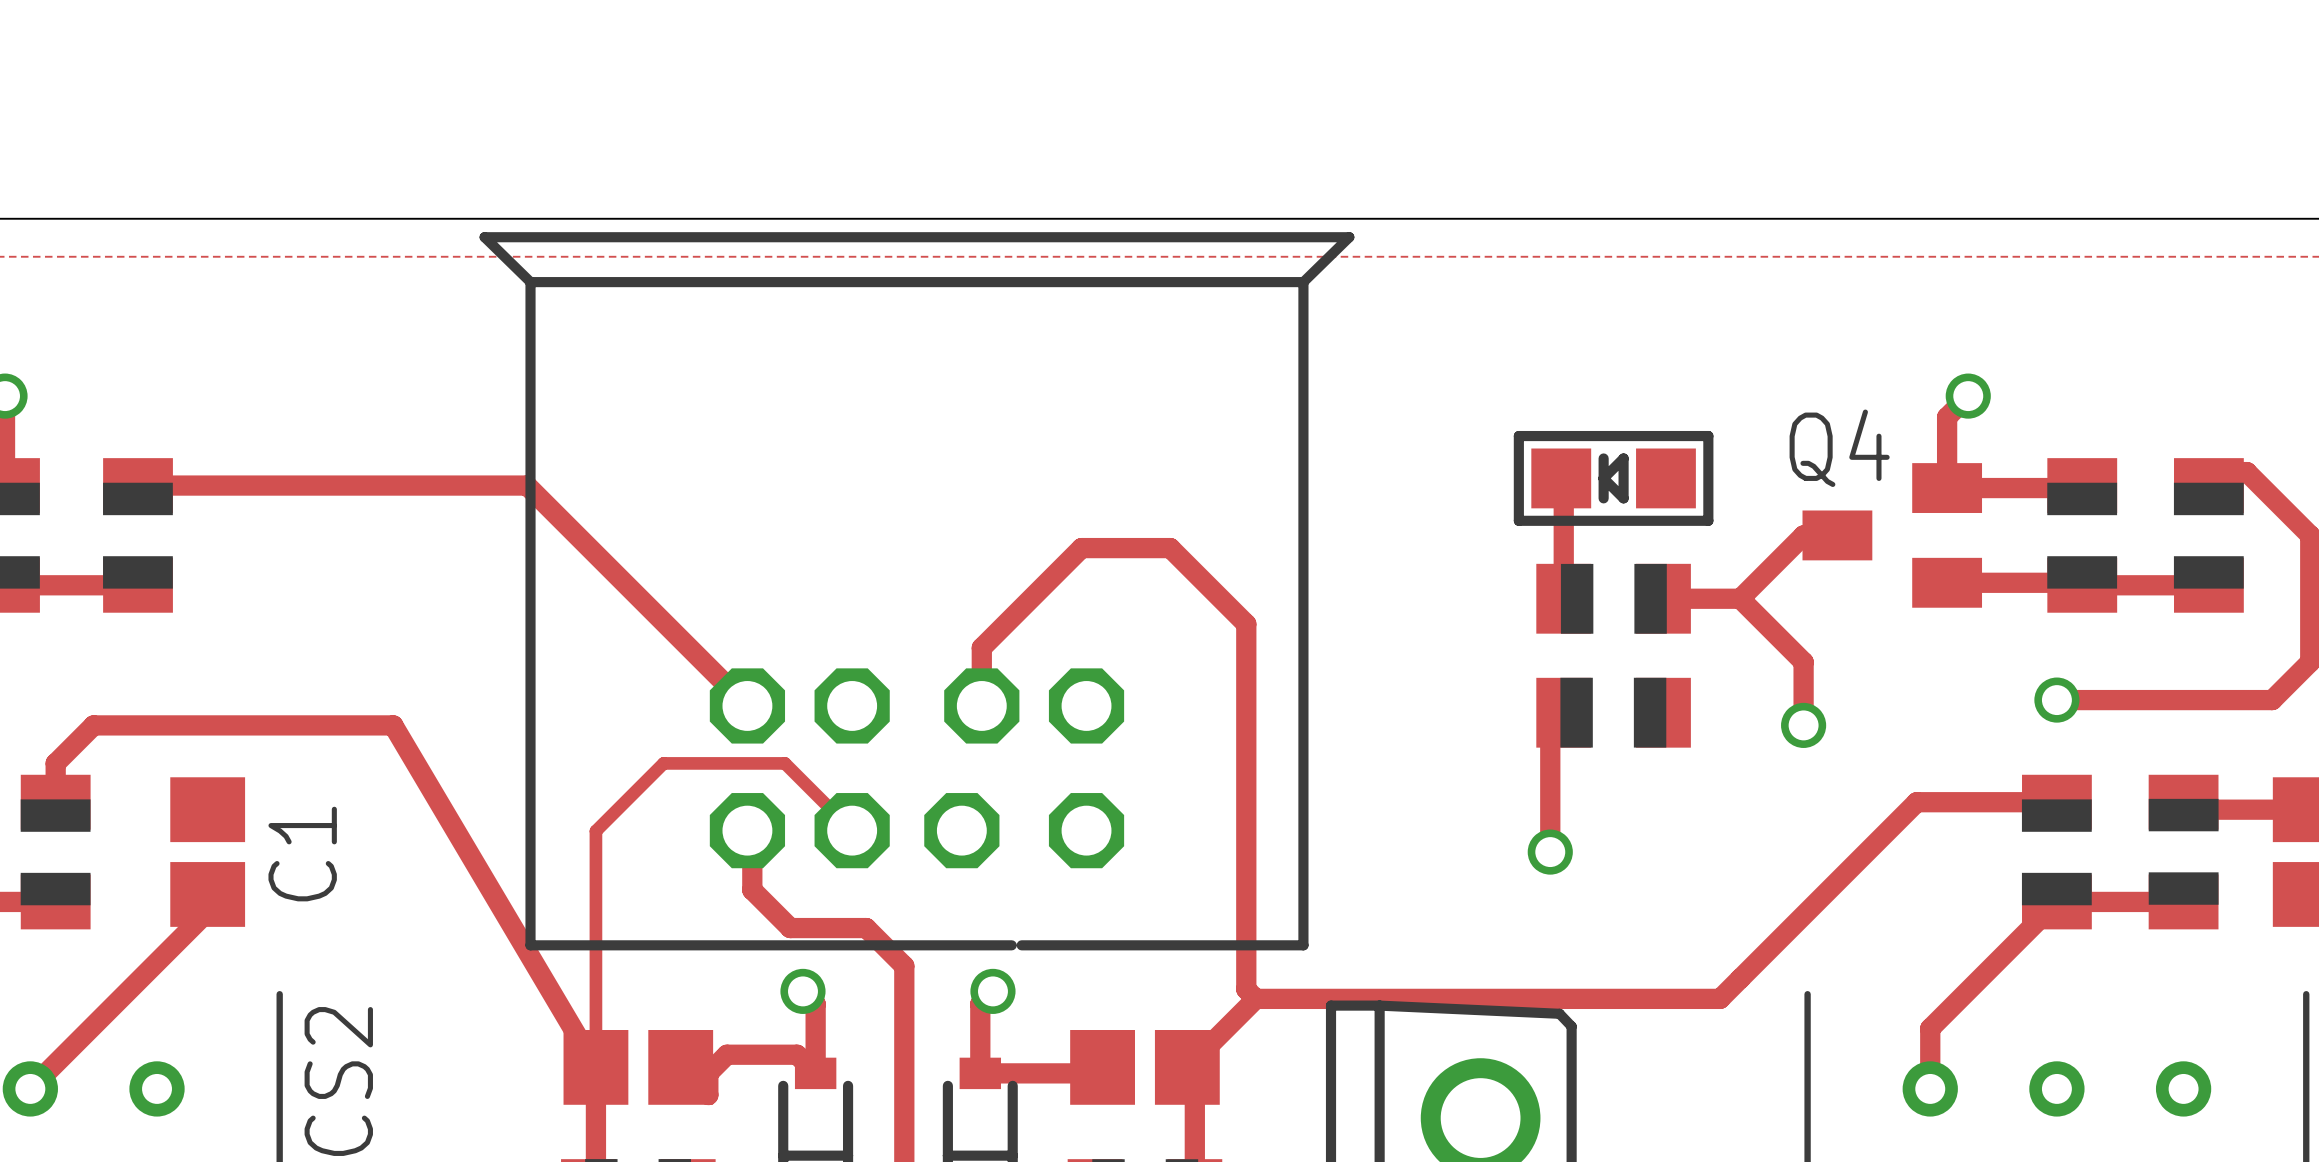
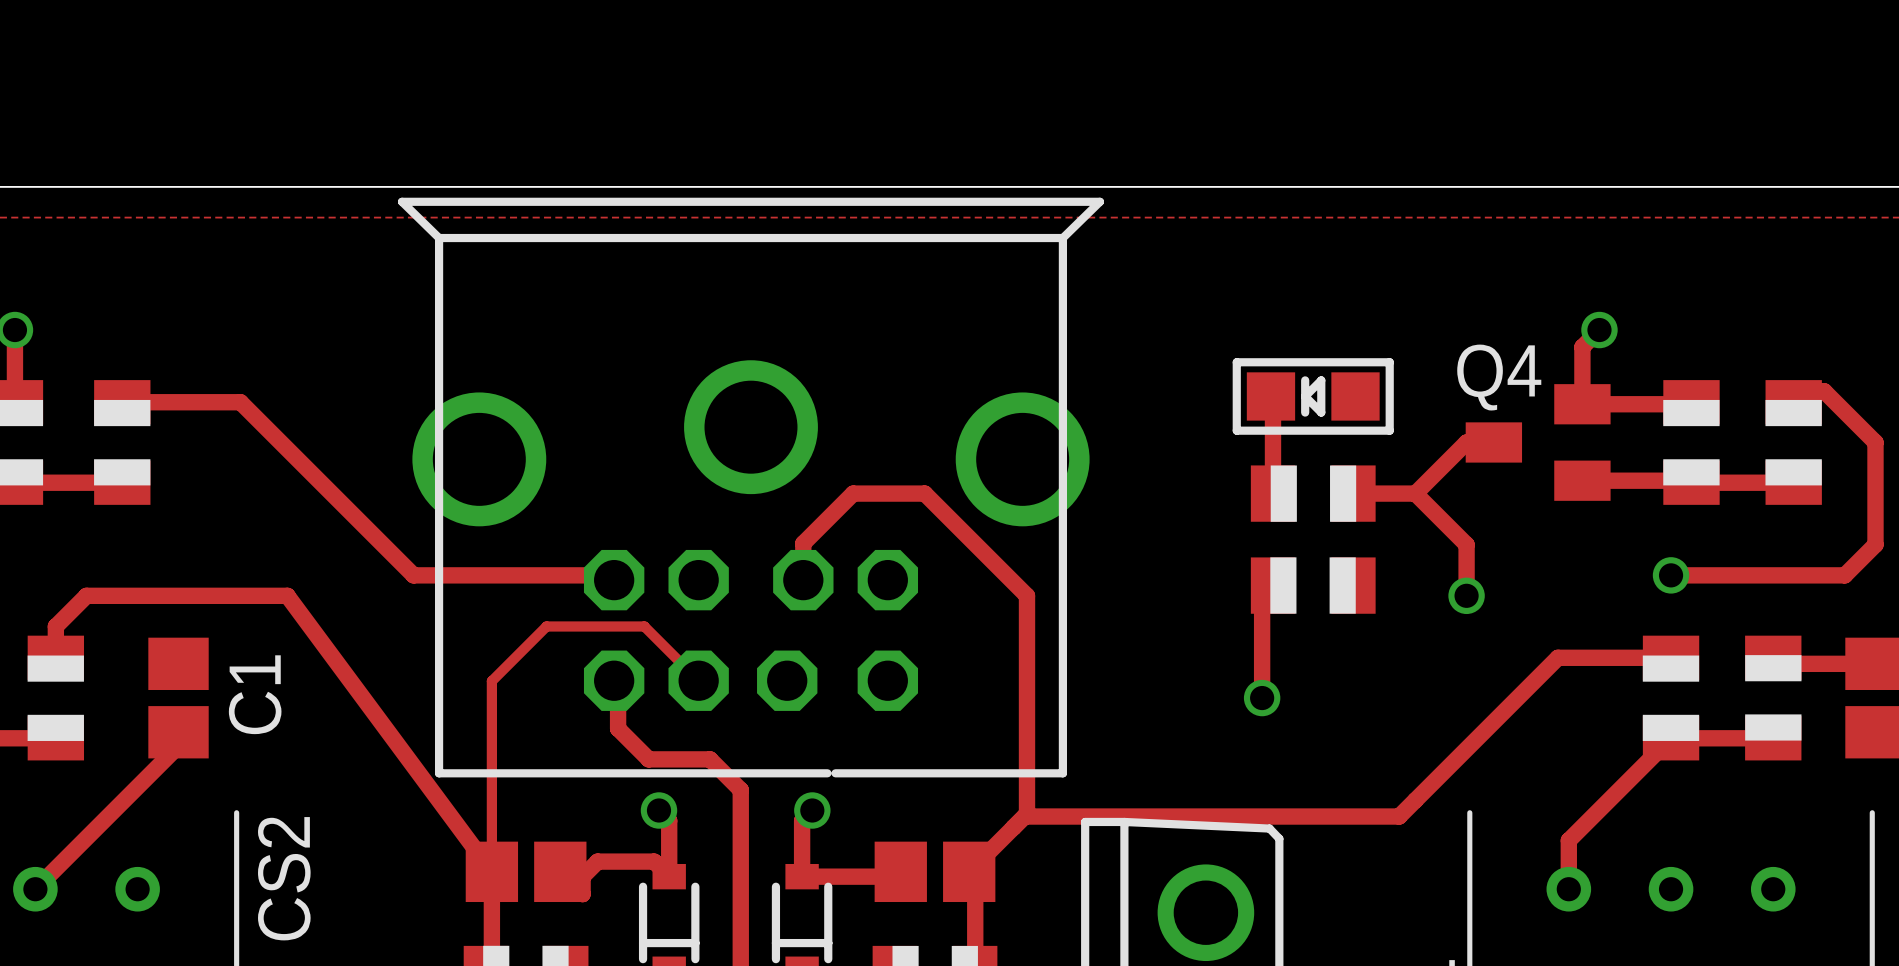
part footprint: [479, 232, 1355, 951] -> [397, 197, 1105, 778]
track: (284, 485) (527, 485) (741, 700) -> (240, 402) (413, 575) (609, 575)
track: (981, 660) (981, 647) (1081, 548) (1170, 548) (1246, 624) (1246, 989) (1255, 998) -> (803, 543) (853, 493) (924, 493) (1027, 595) (1027, 814) (1024, 816)
track: (342, 725) (393, 725) (595, 1067) -> (287, 595) (491, 871)

